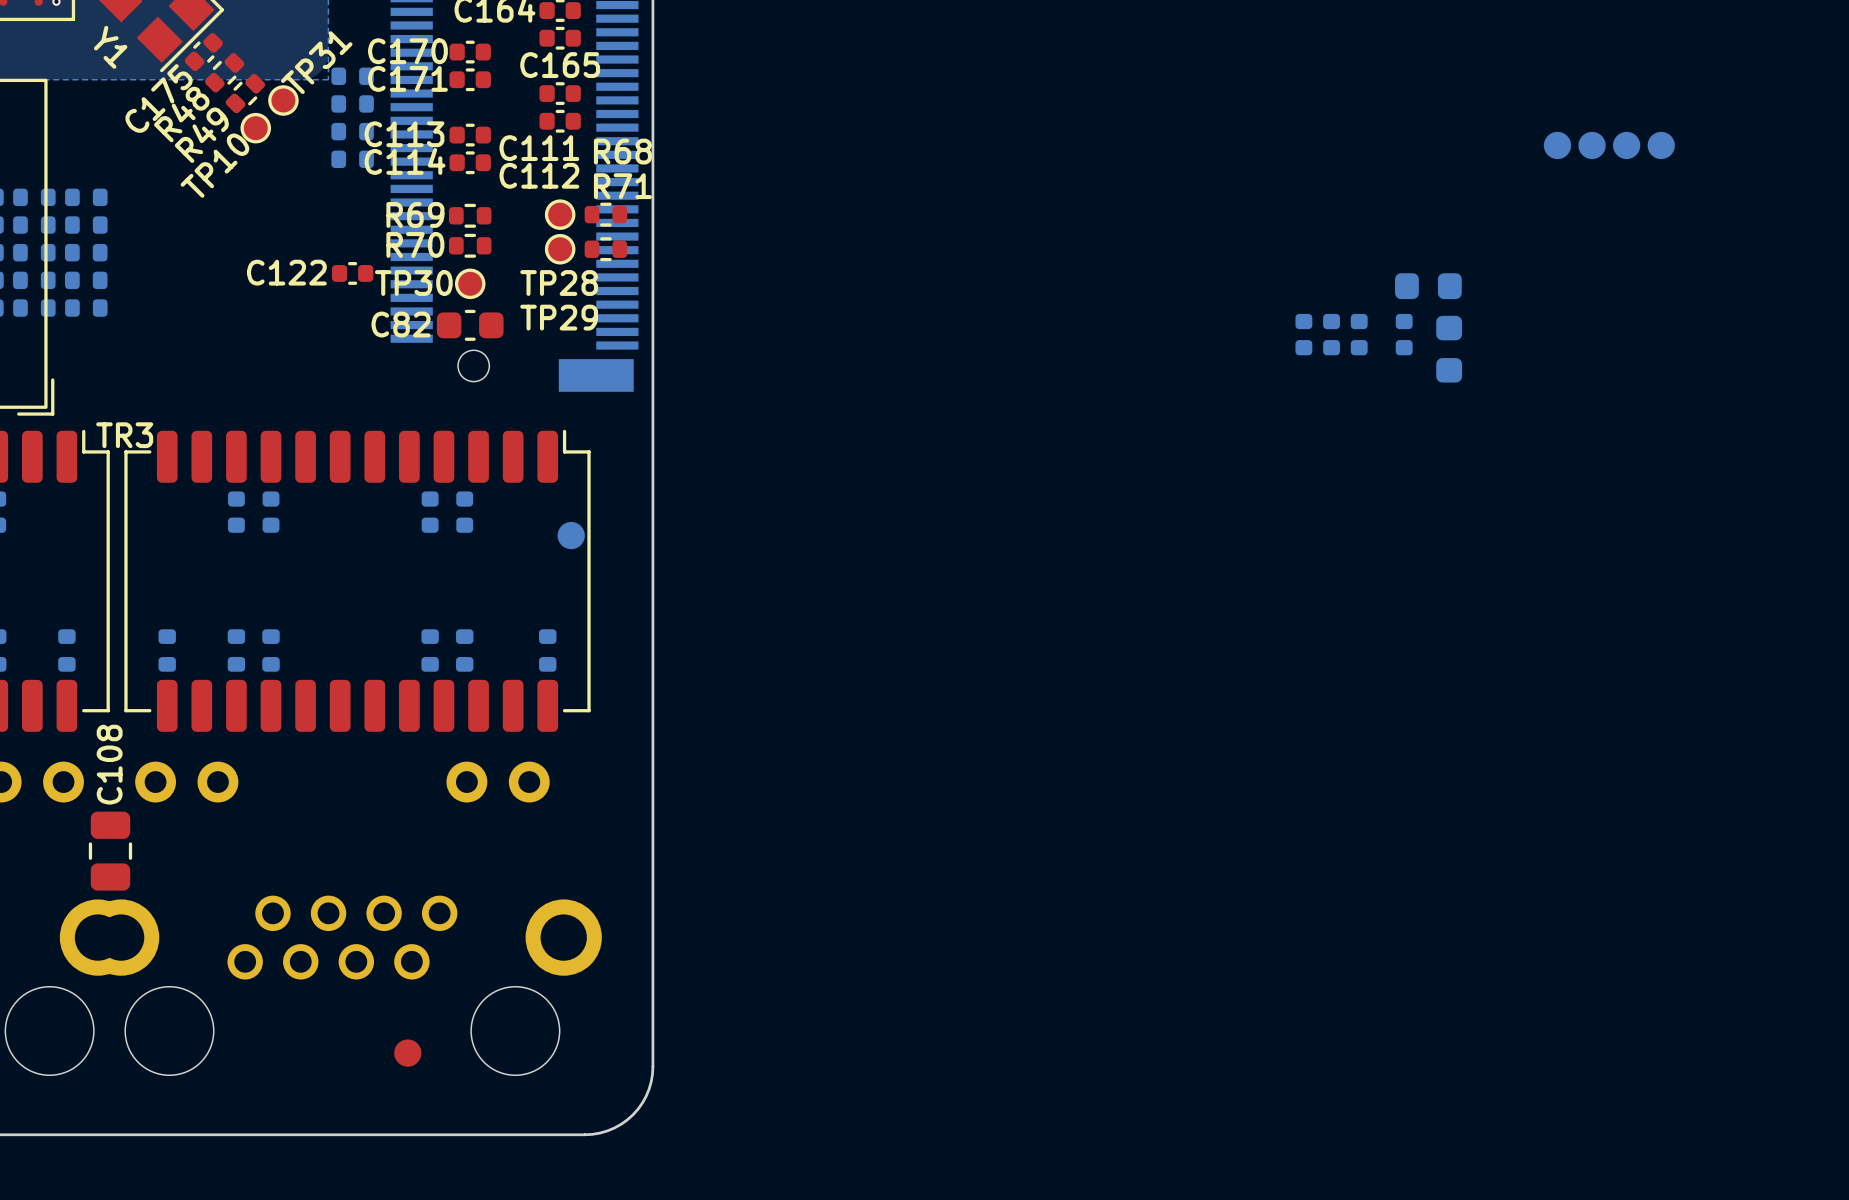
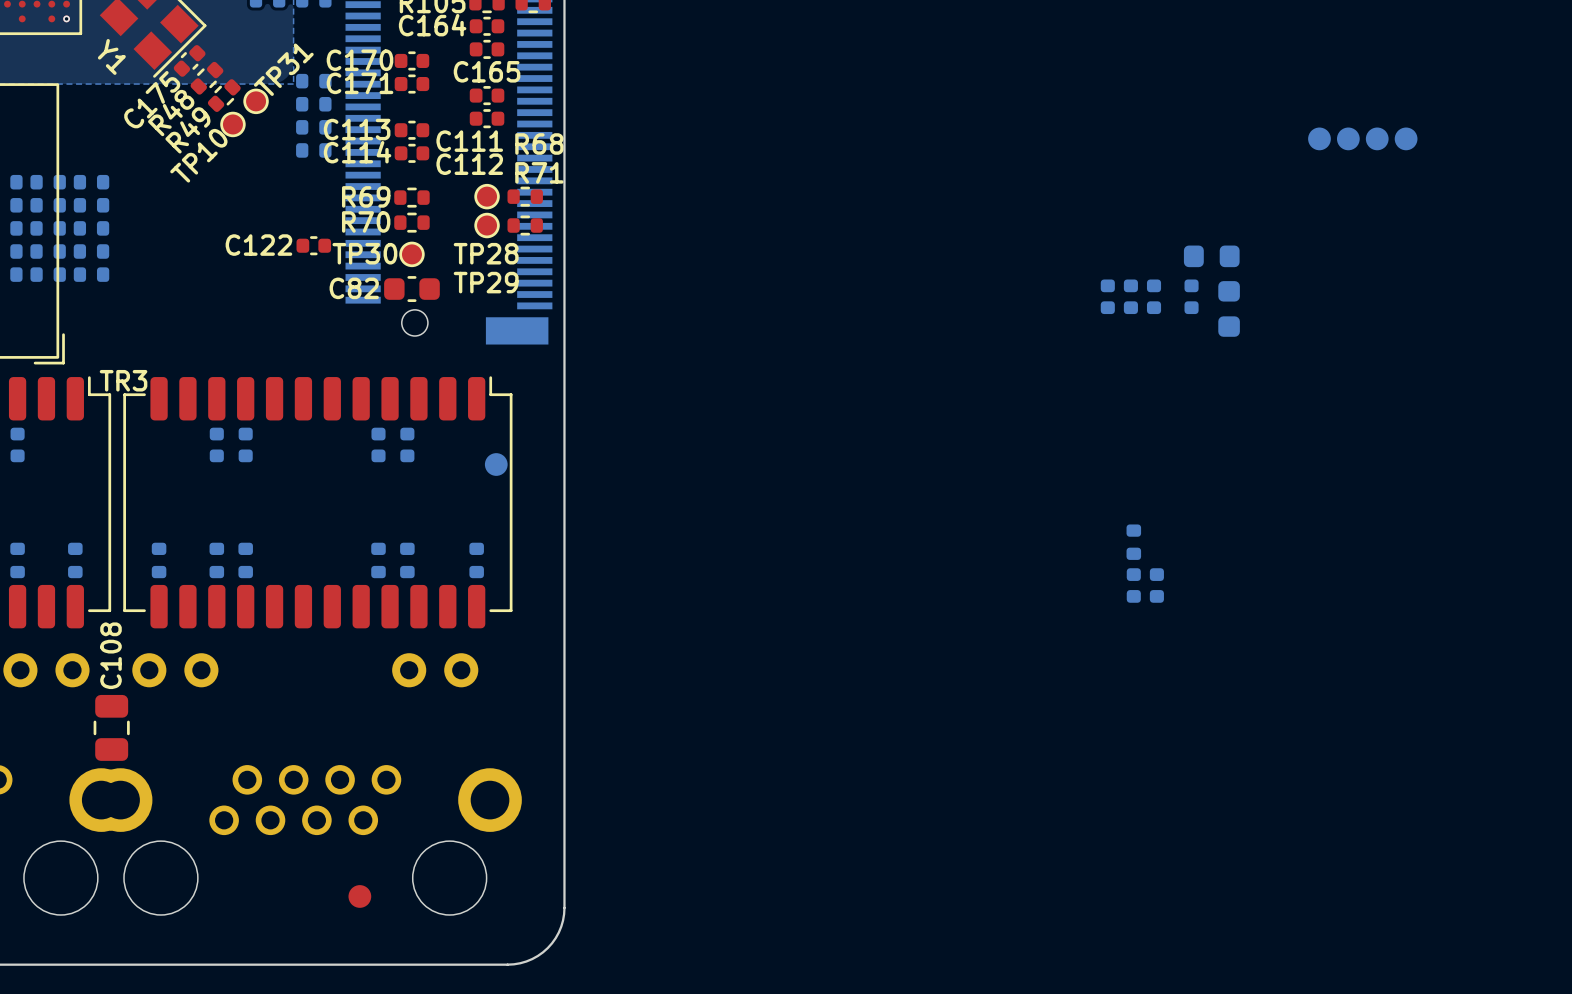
part: none -> (1133, 542)
part: none -> (1133, 585)
part: none -> (1156, 585)

